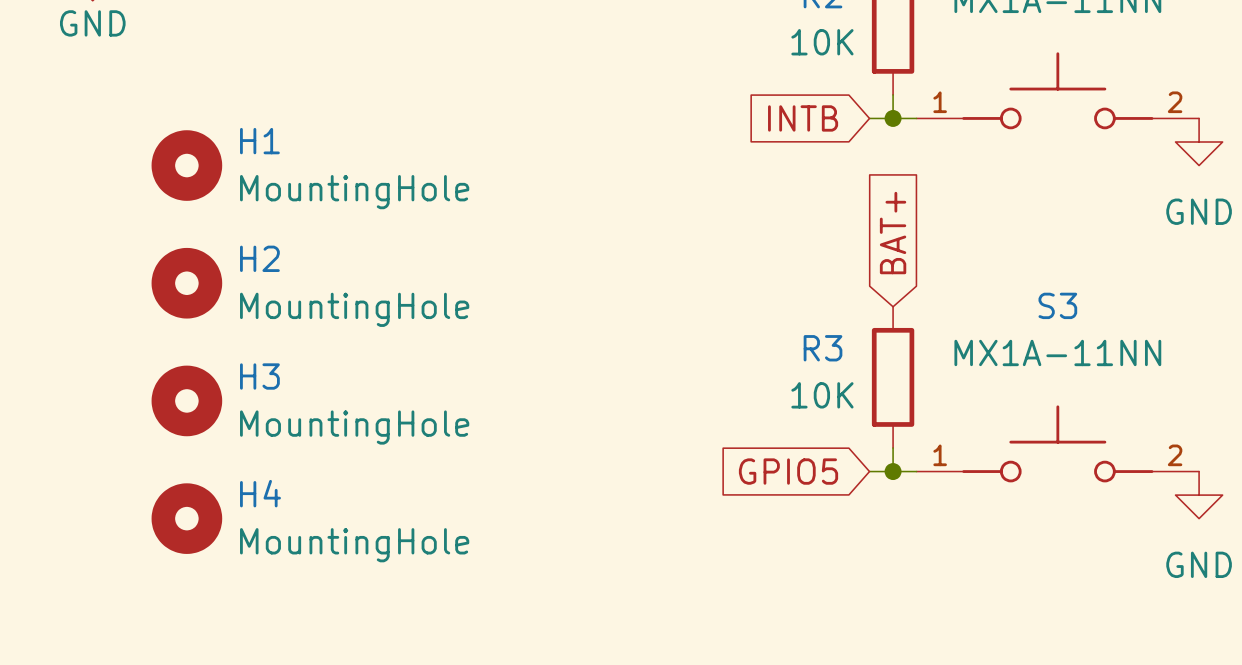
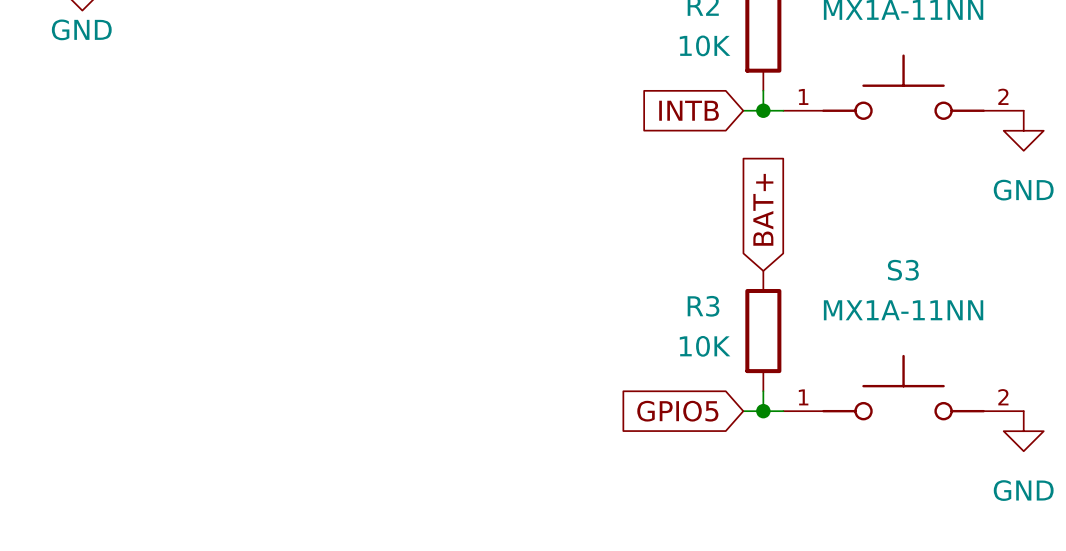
H1: MountingHole (186, 165) -> none
H2: MountingHole (186, 283) -> none
H3: MountingHole (186, 400) -> none
H4: MountingHole (186, 518) -> none

